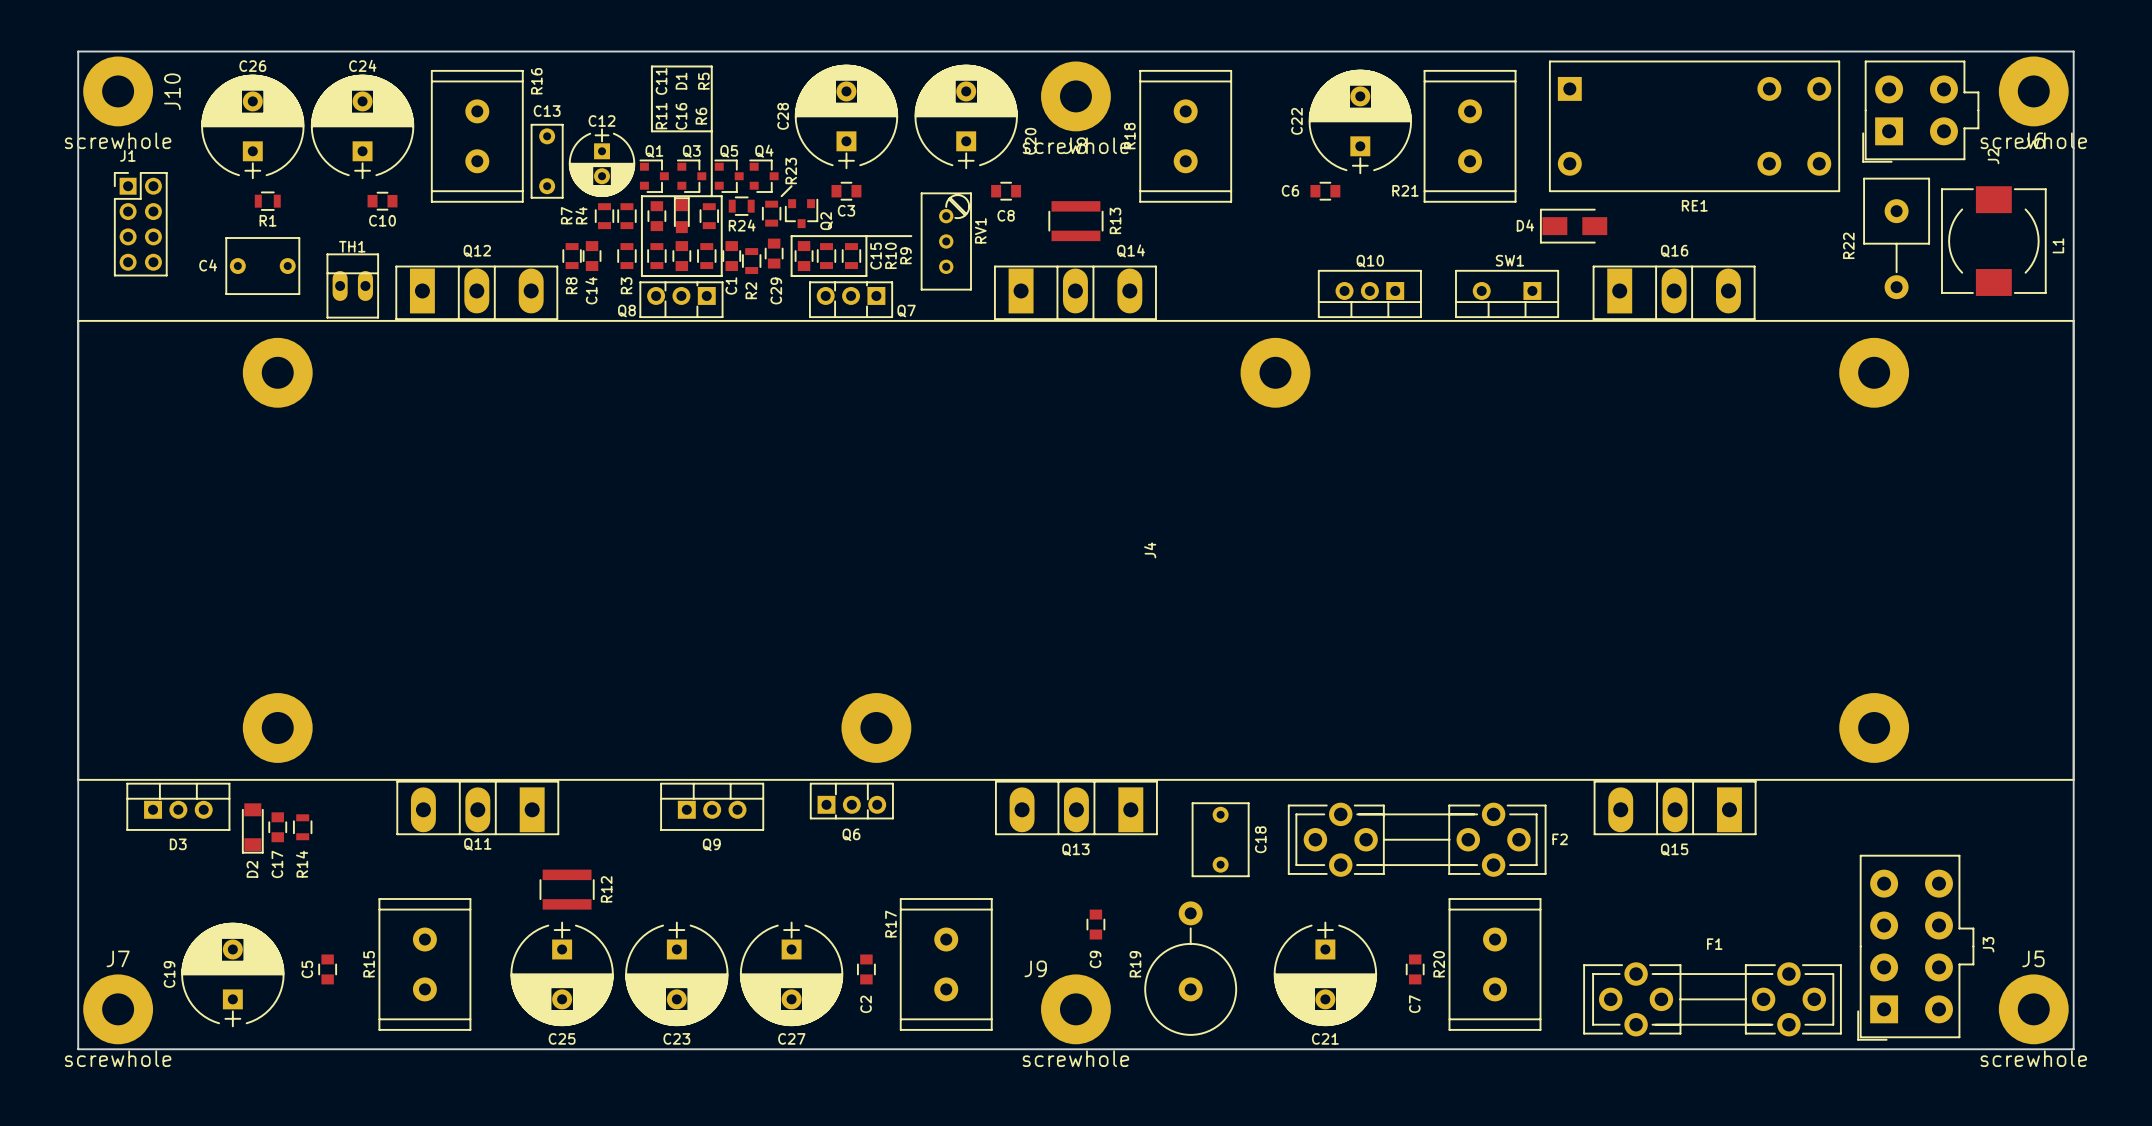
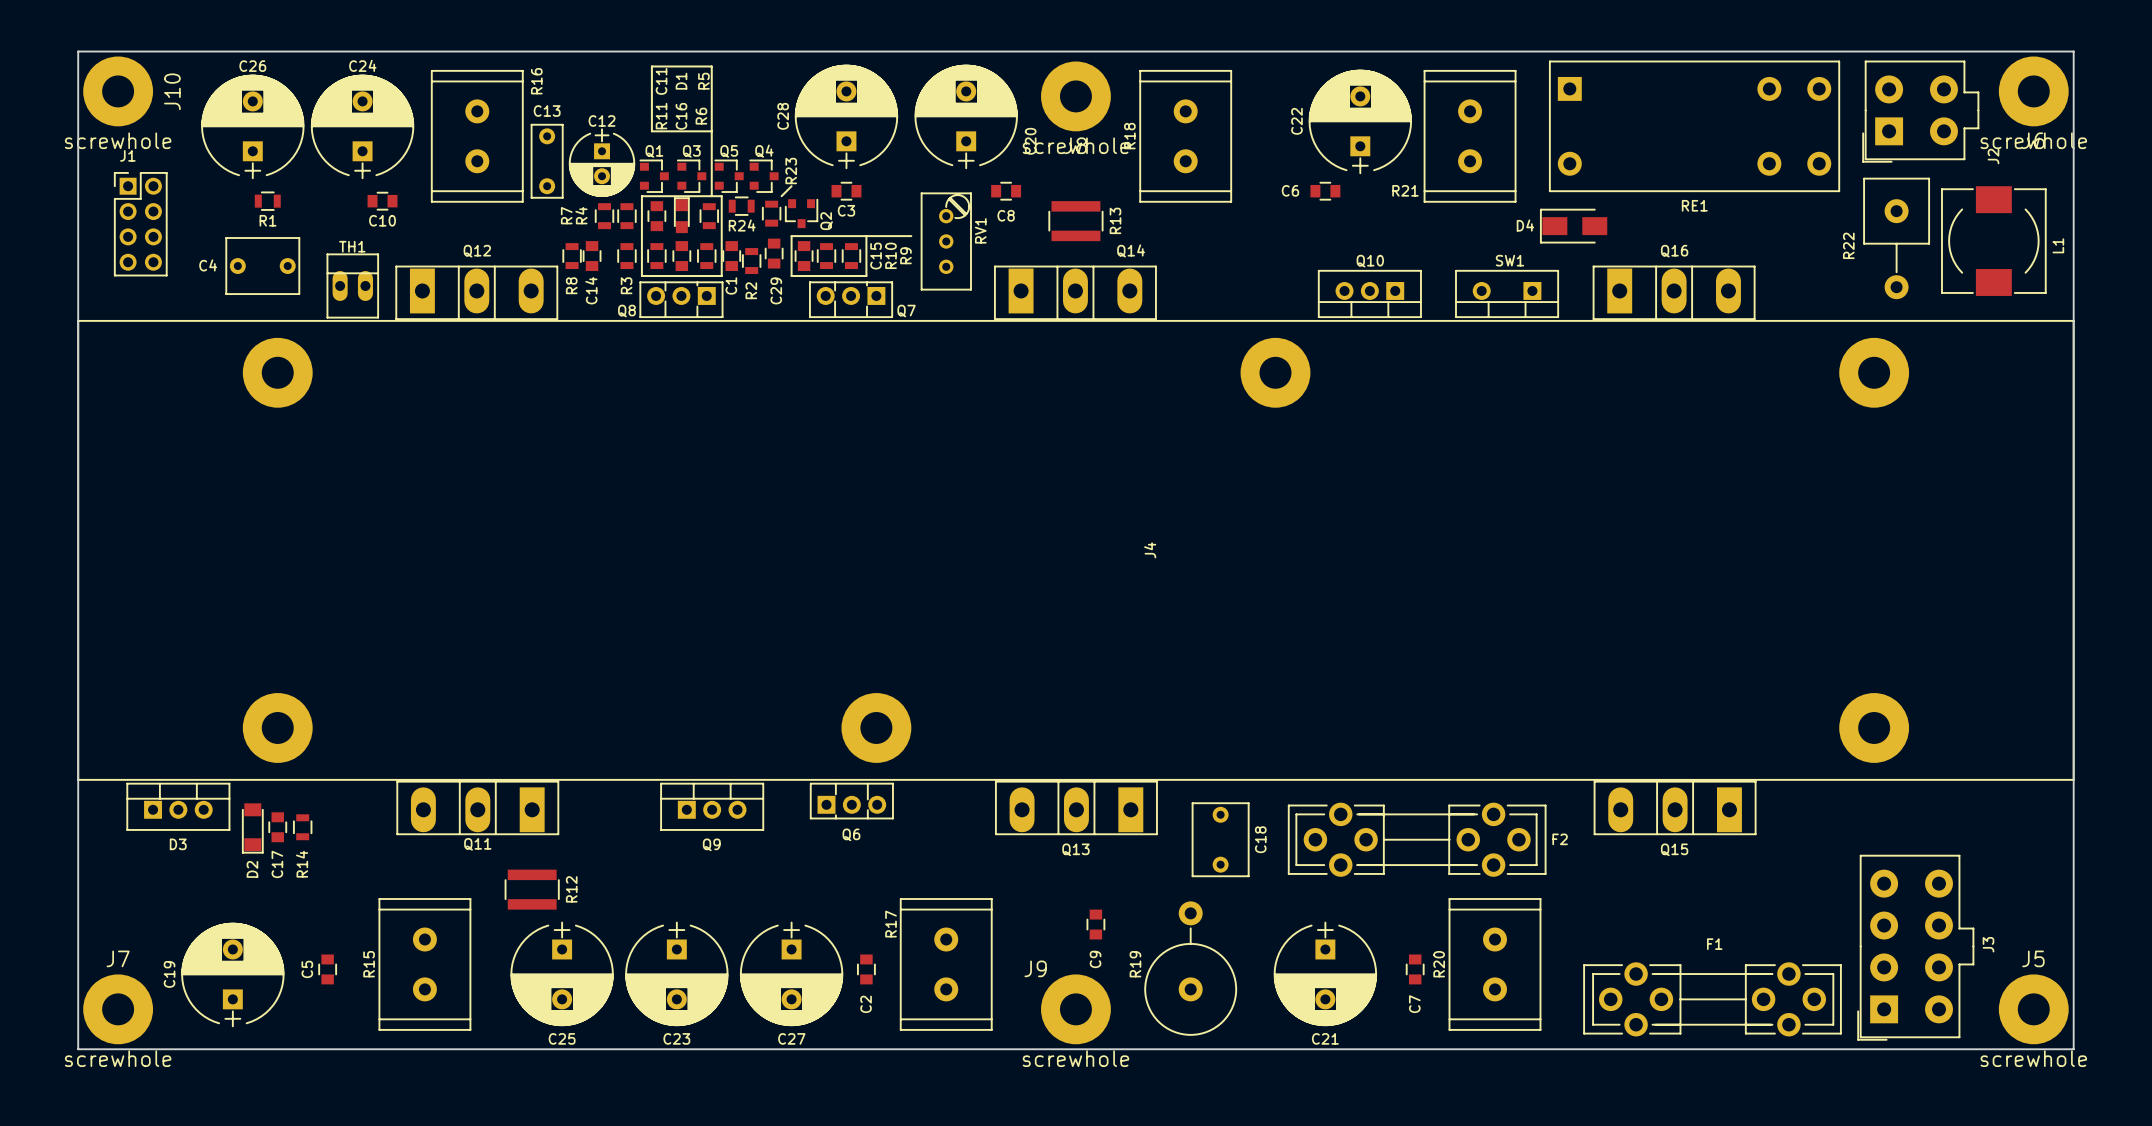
R12 position: (567, 889) -> (532, 889)

